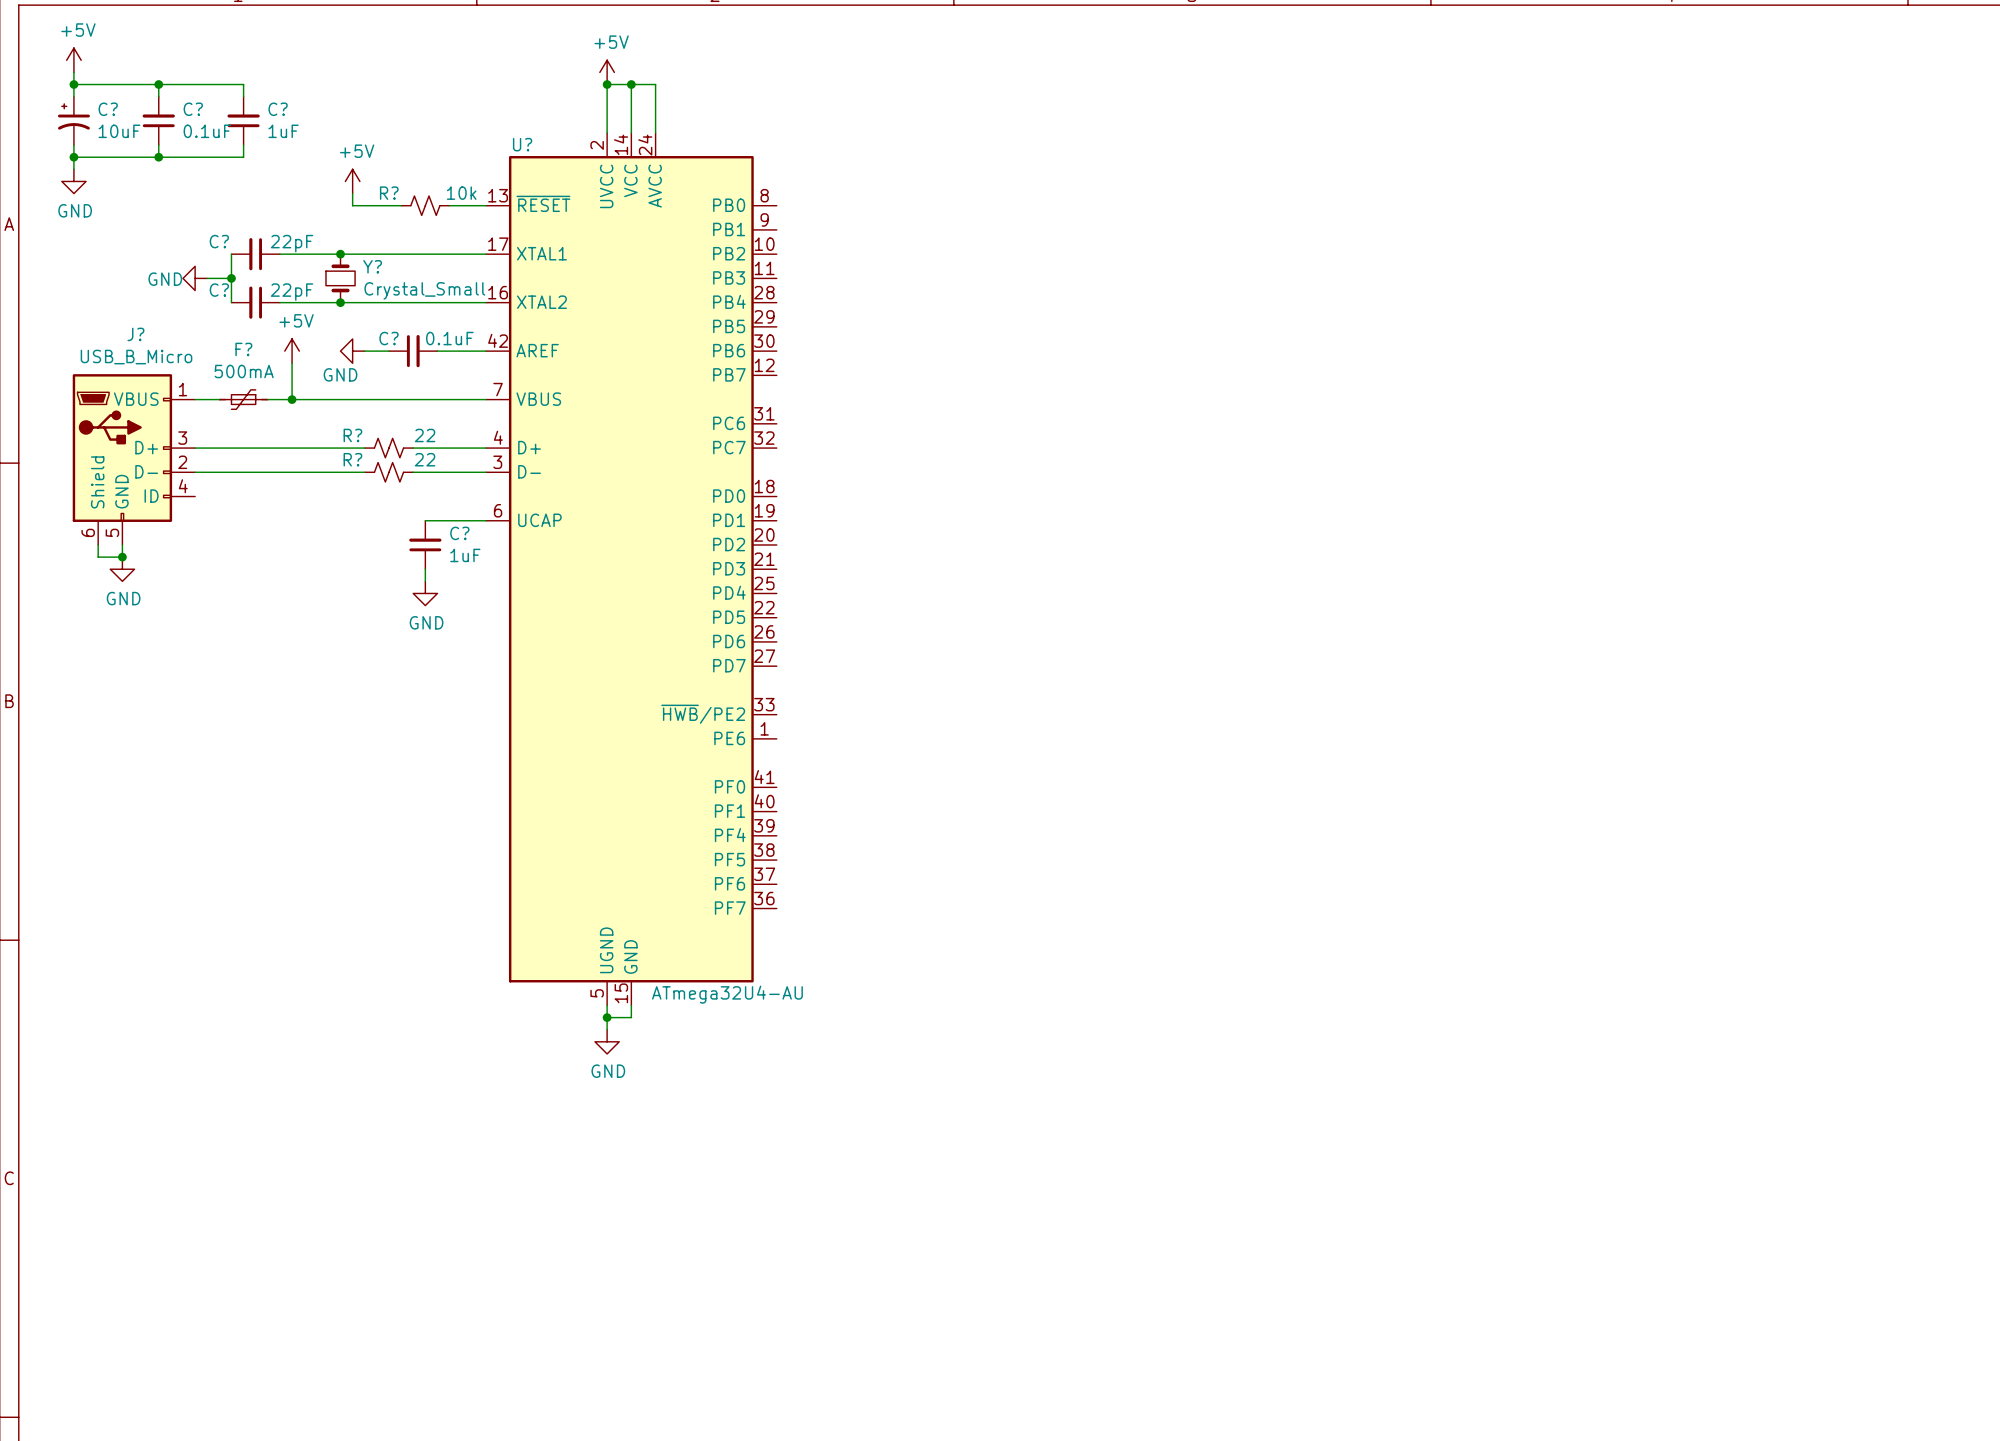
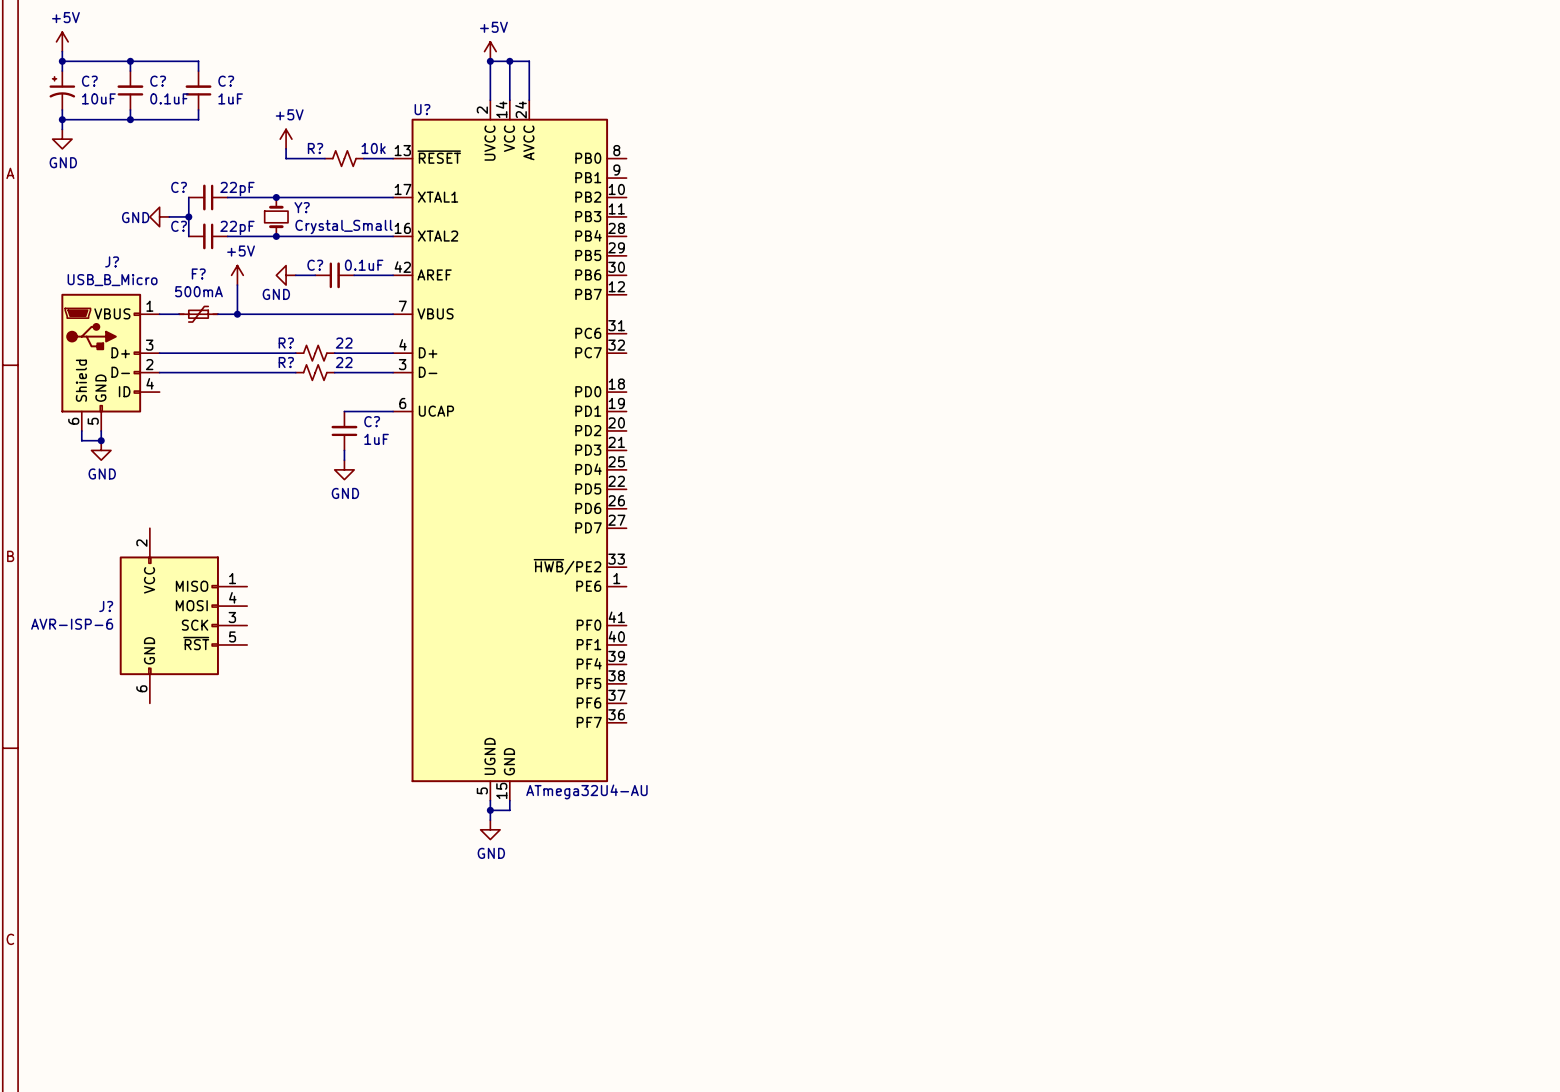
J?: none -> AVR-ISP-6 (183, 615)

